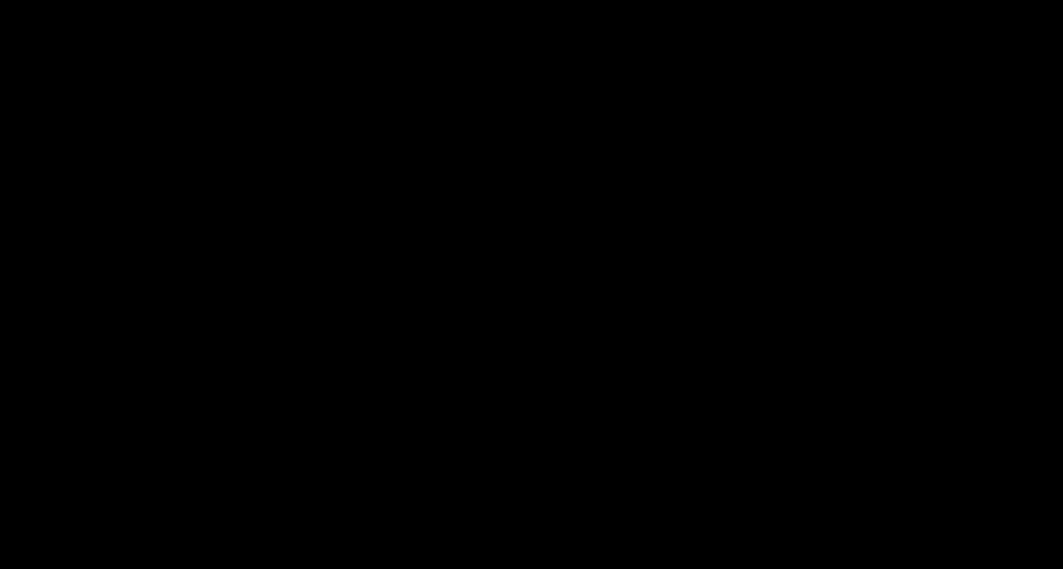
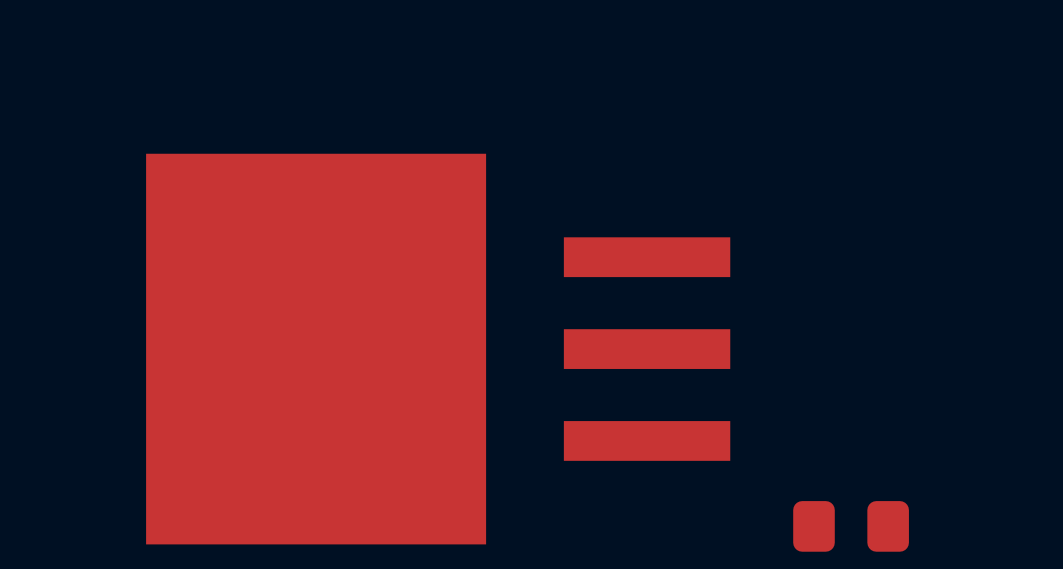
part: none -> (438, 349)
part: none -> (851, 526)

